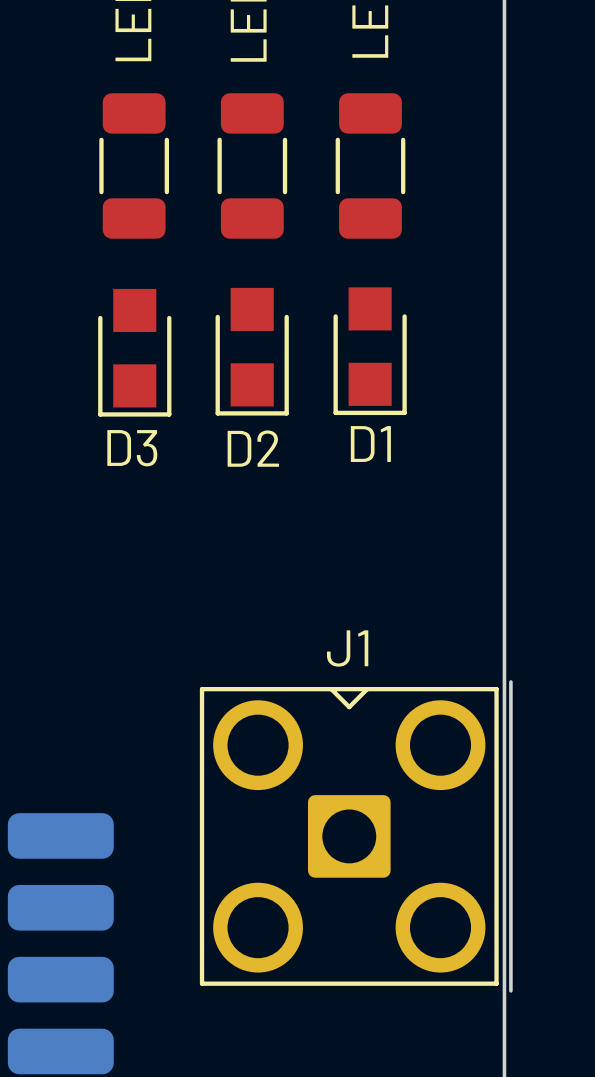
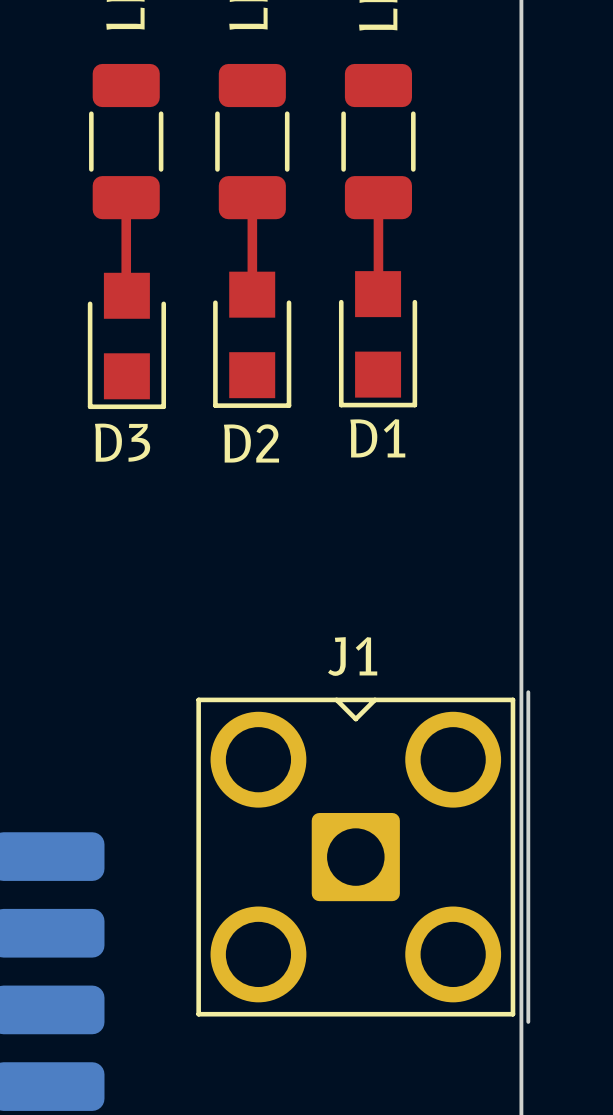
top track: none -> (126, 197) (126, 295)
top track: none -> (252, 197) (252, 294)
top track: none -> (378, 197) (378, 293)

